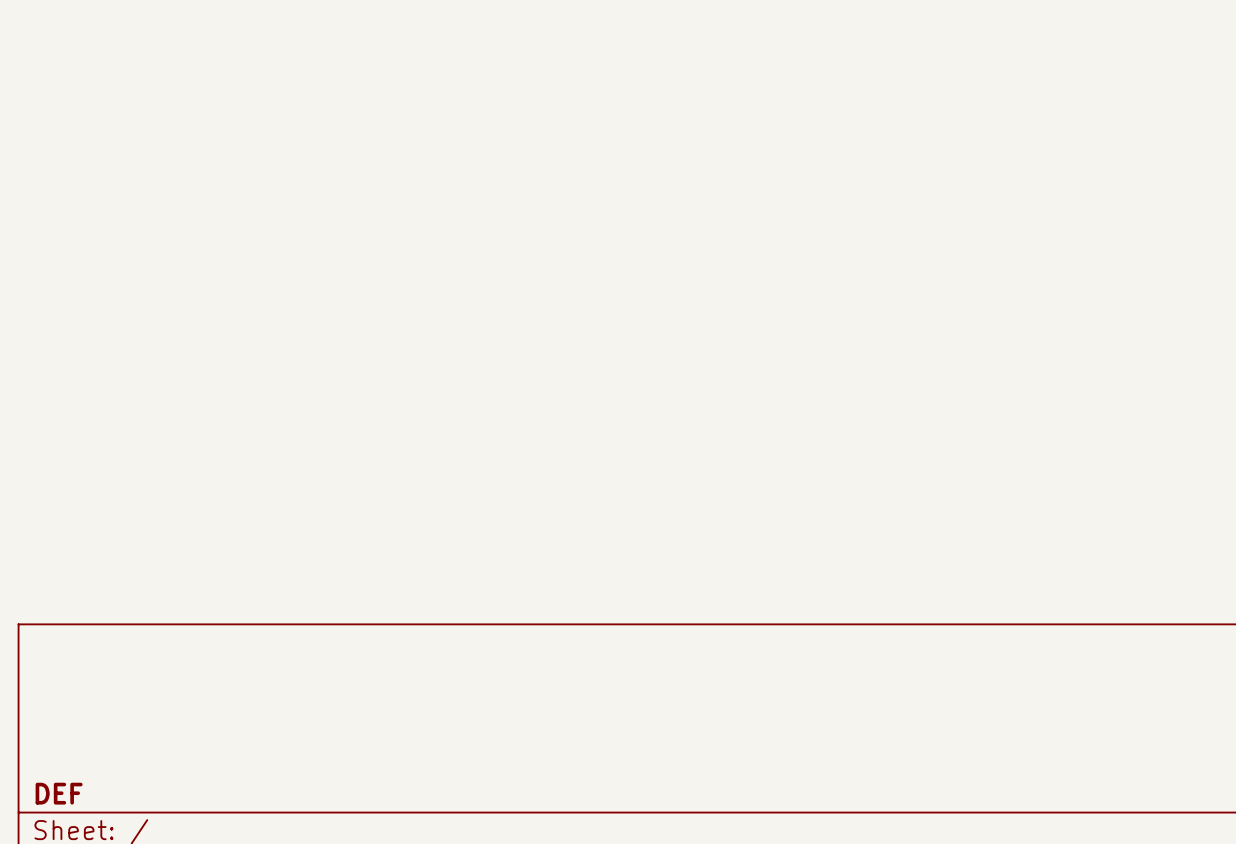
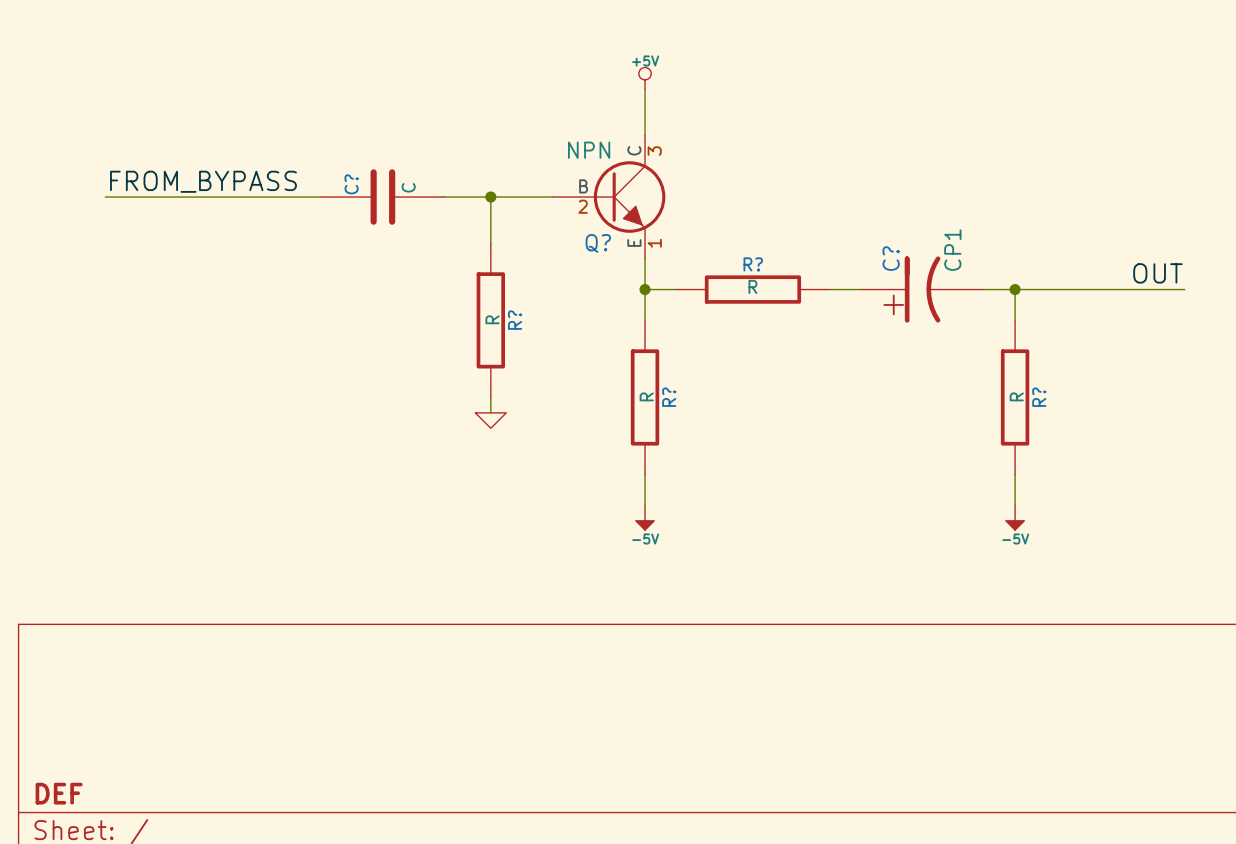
power symbol: none -> +5V (645, 78)
wire: none -> (645, 89) (645, 135)
label: none -> FROM_BYPASS (203, 181)
wire: none -> (105, 197) (321, 197)
C?: none -> C (382, 197)
wire: none -> (444, 197) (552, 197)
wire: none -> (490, 197) (490, 243)
junction: none -> (490, 197)
Q?: none -> NPN (608, 197)
wire: none -> (645, 258) (645, 320)
label: none -> OUT (1157, 273)
wire: none -> (645, 289) (675, 289)
junction: none -> (645, 289)
R?: none -> R (752, 289)
wire: none -> (830, 289) (860, 289)
C?: none -> CP1 (922, 289)
wire: none -> (984, 289) (1184, 289)
wire: none -> (1015, 289) (1015, 320)
junction: none -> (1015, 289)
R?: none -> R (490, 320)
wire: none -> (490, 397) (490, 412)
R?: none -> R (645, 397)
R?: none -> R (1015, 397)
power symbol: none -> (490, 420)
wire: none -> (645, 474) (645, 505)
wire: none -> (1015, 474) (1015, 505)
power symbol: none -> -5V (645, 517)
power symbol: none -> -5V (1015, 517)

